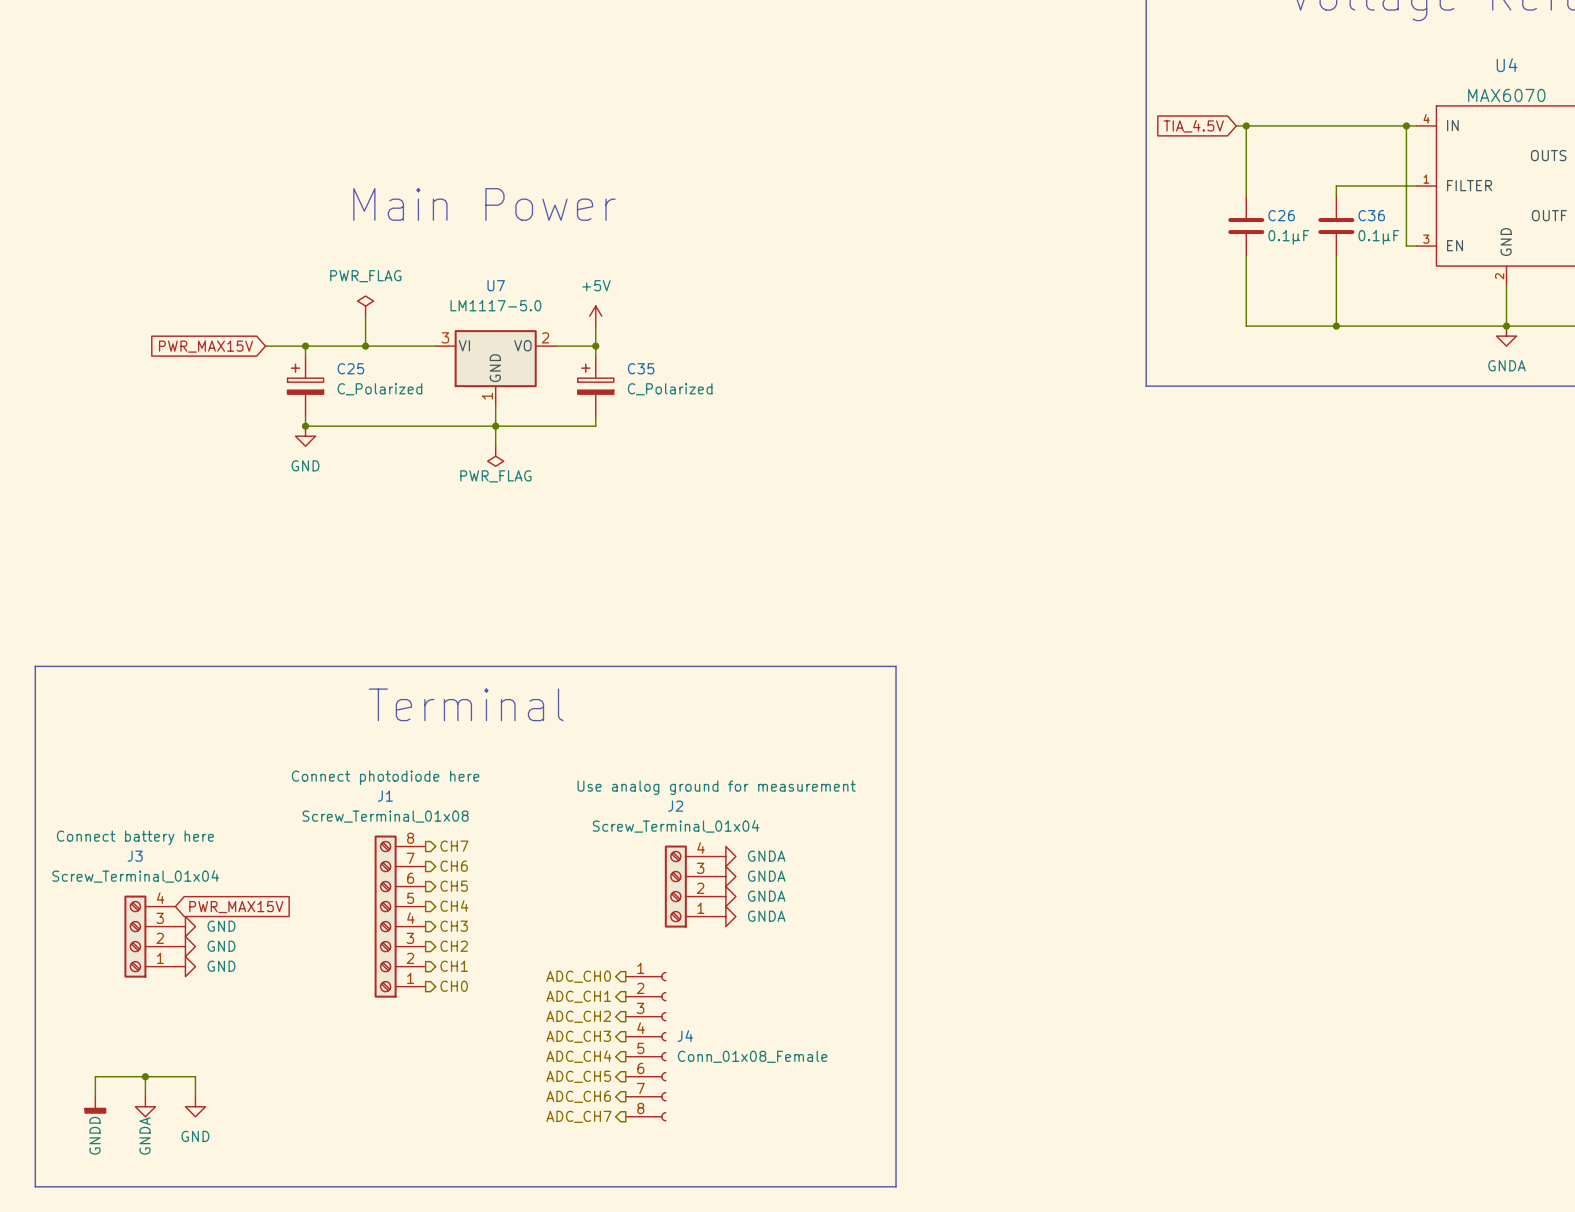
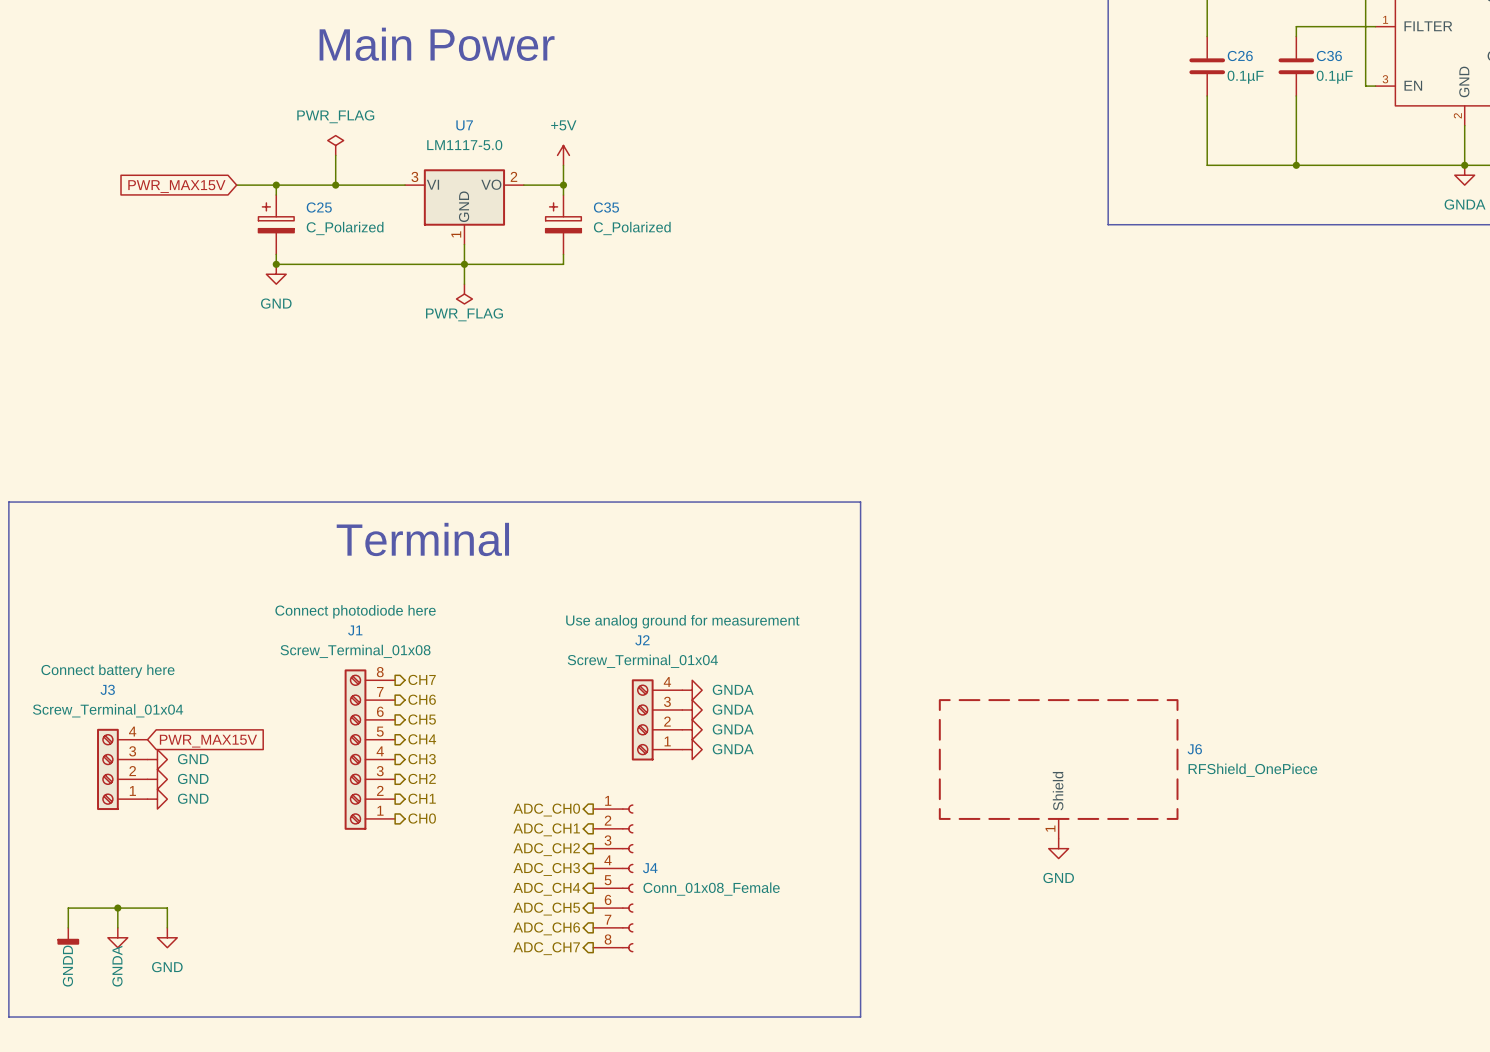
J6: none -> RFShield_OnePiece (1058, 768)
power symbol: none -> GND (1058, 848)

